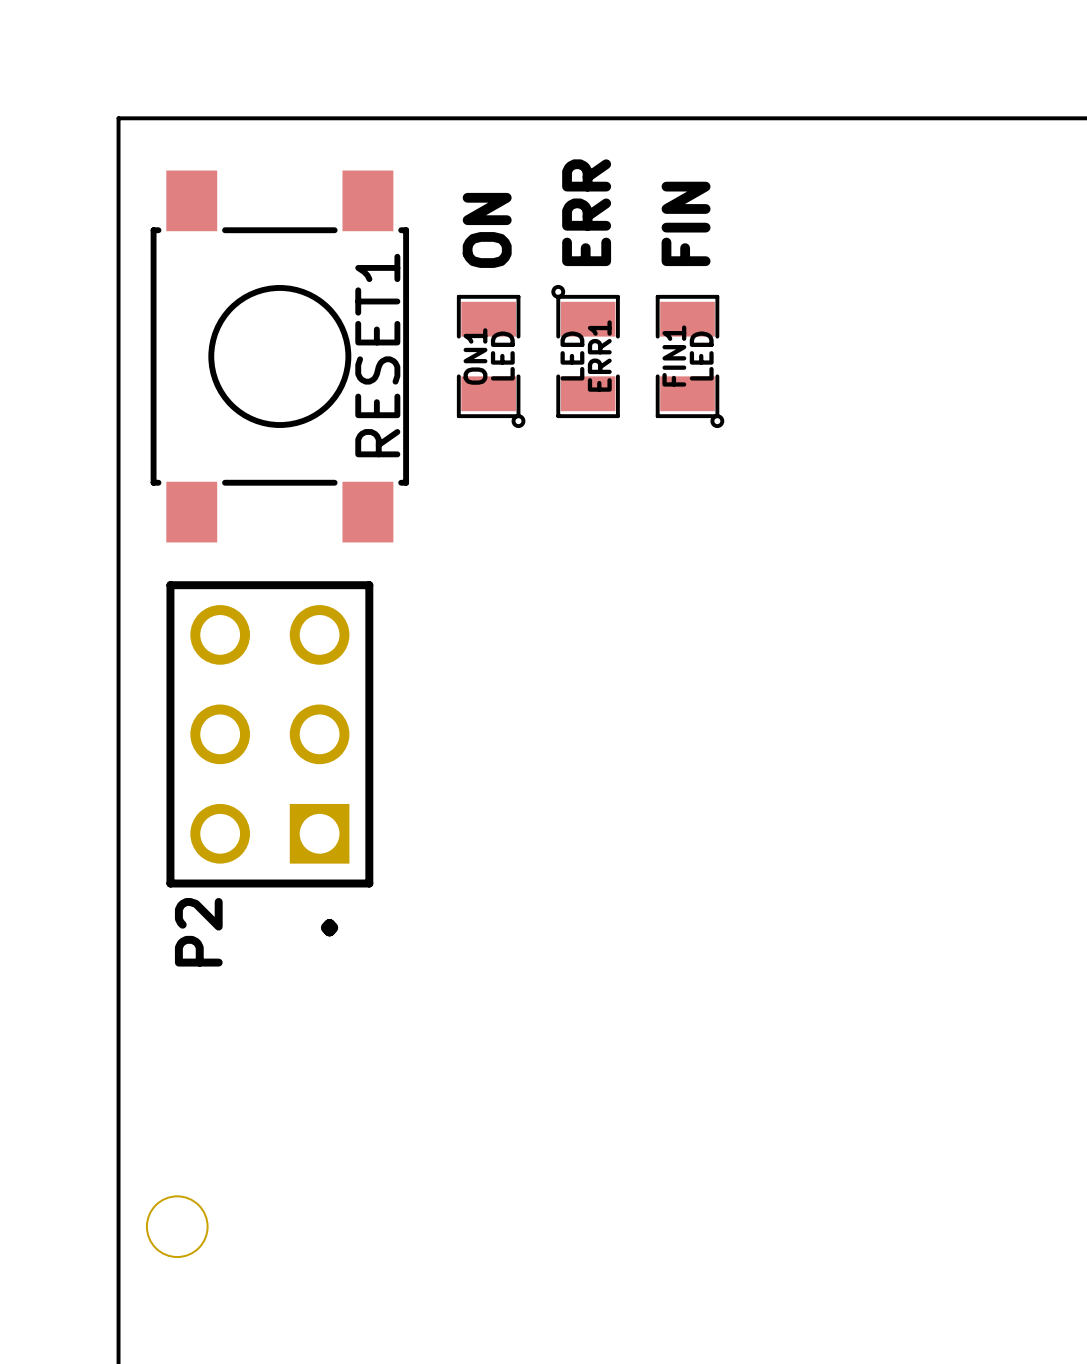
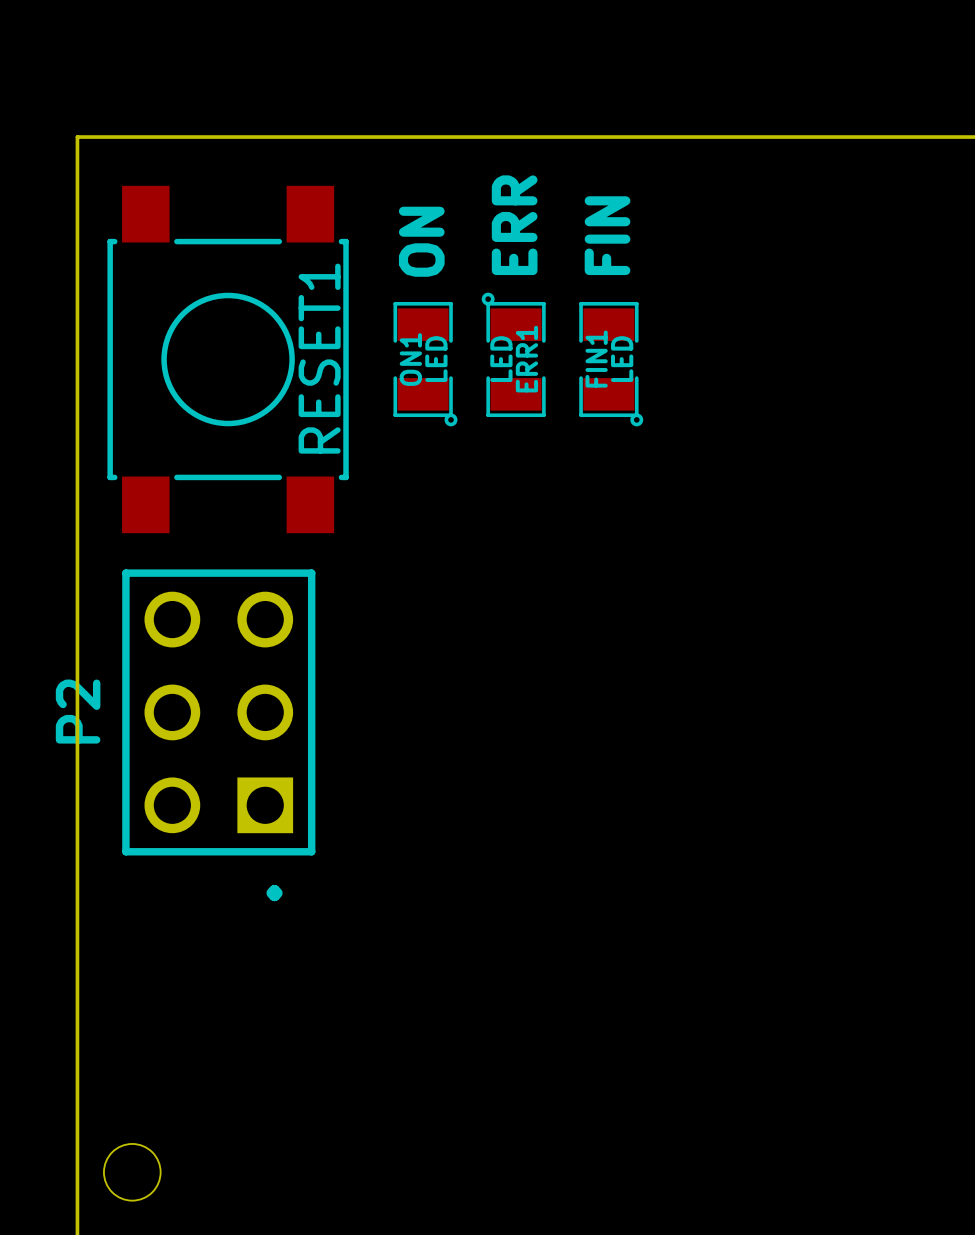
P2 name position: P2 (198, 932) -> P2 (78, 711)

